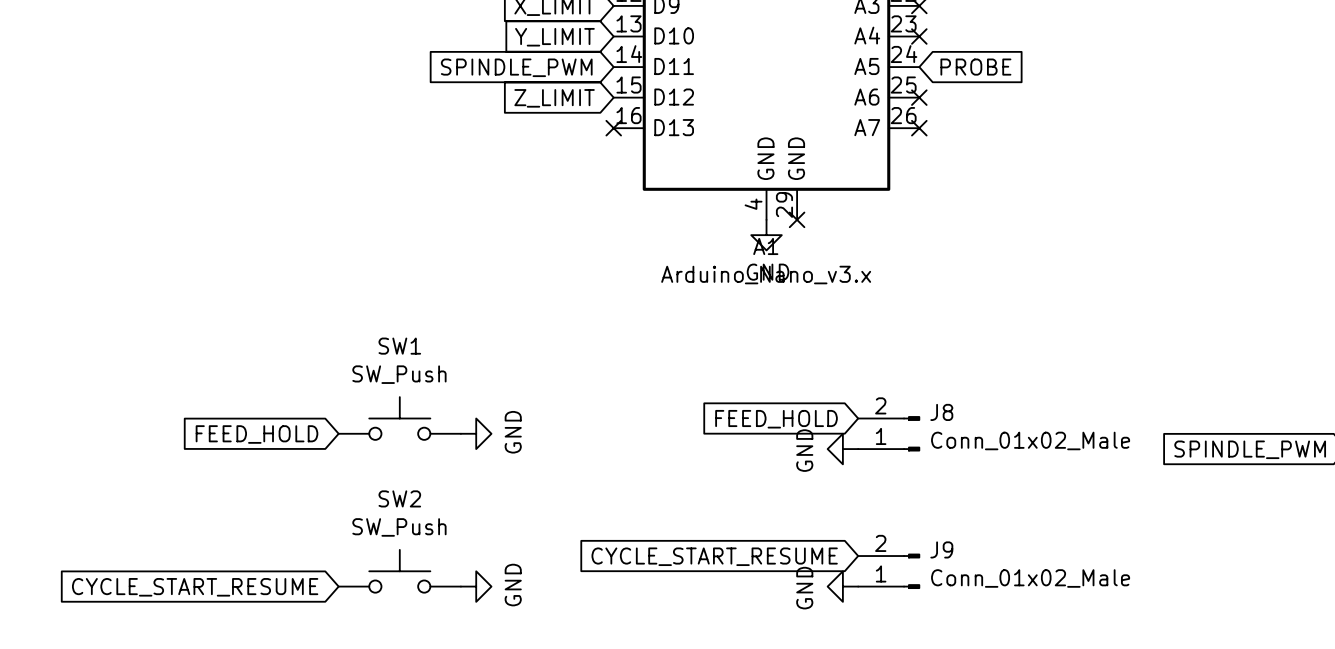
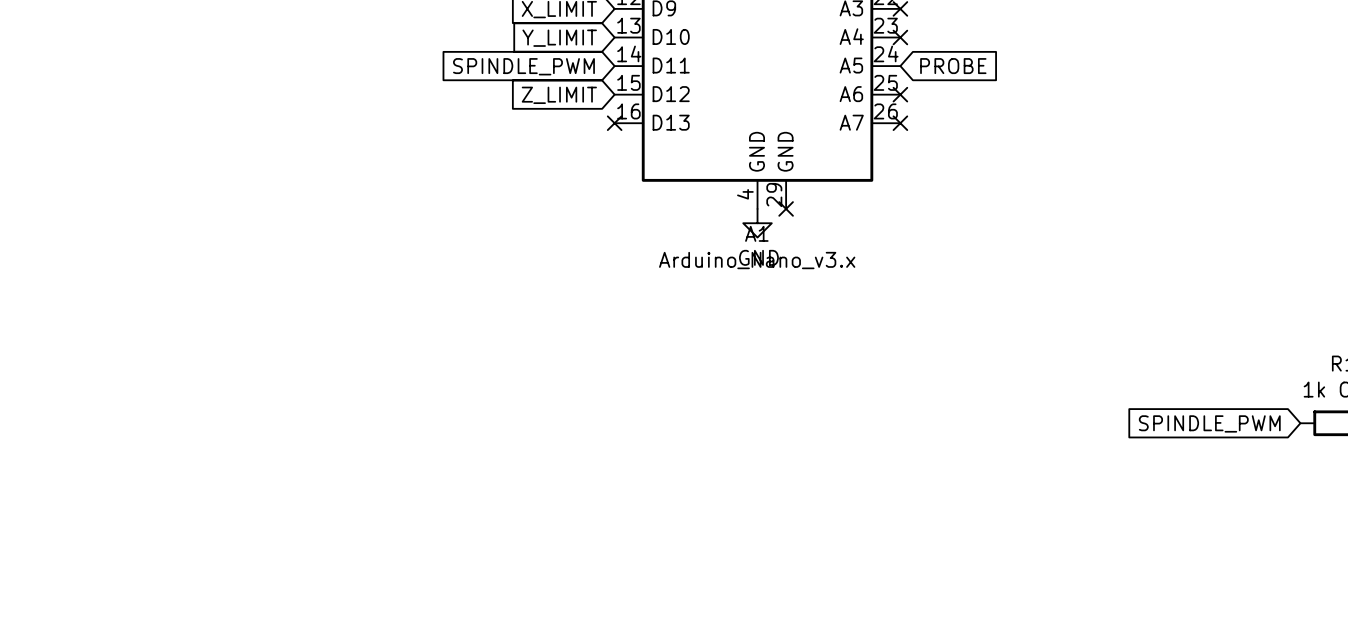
SW1: SW_Push (399, 418) -> none
global label: FEED_HOLD (776, 419) -> none
power symbol: GND (476, 433) -> none
J8: Conn_01x02_Male (889, 433) -> none
global label: FEED_HOLD (256, 434) -> none
power symbol: GND (842, 449) -> none
global label: CYCLE_START_RESUME (714, 556) -> none
SW2: SW_Push (399, 571) -> none
J9: Conn_01x02_Male (889, 571) -> none
power symbol: GND (476, 586) -> none
power symbol: GND (842, 586) -> none
global label: CYCLE_START_RESUME (195, 587) -> none

